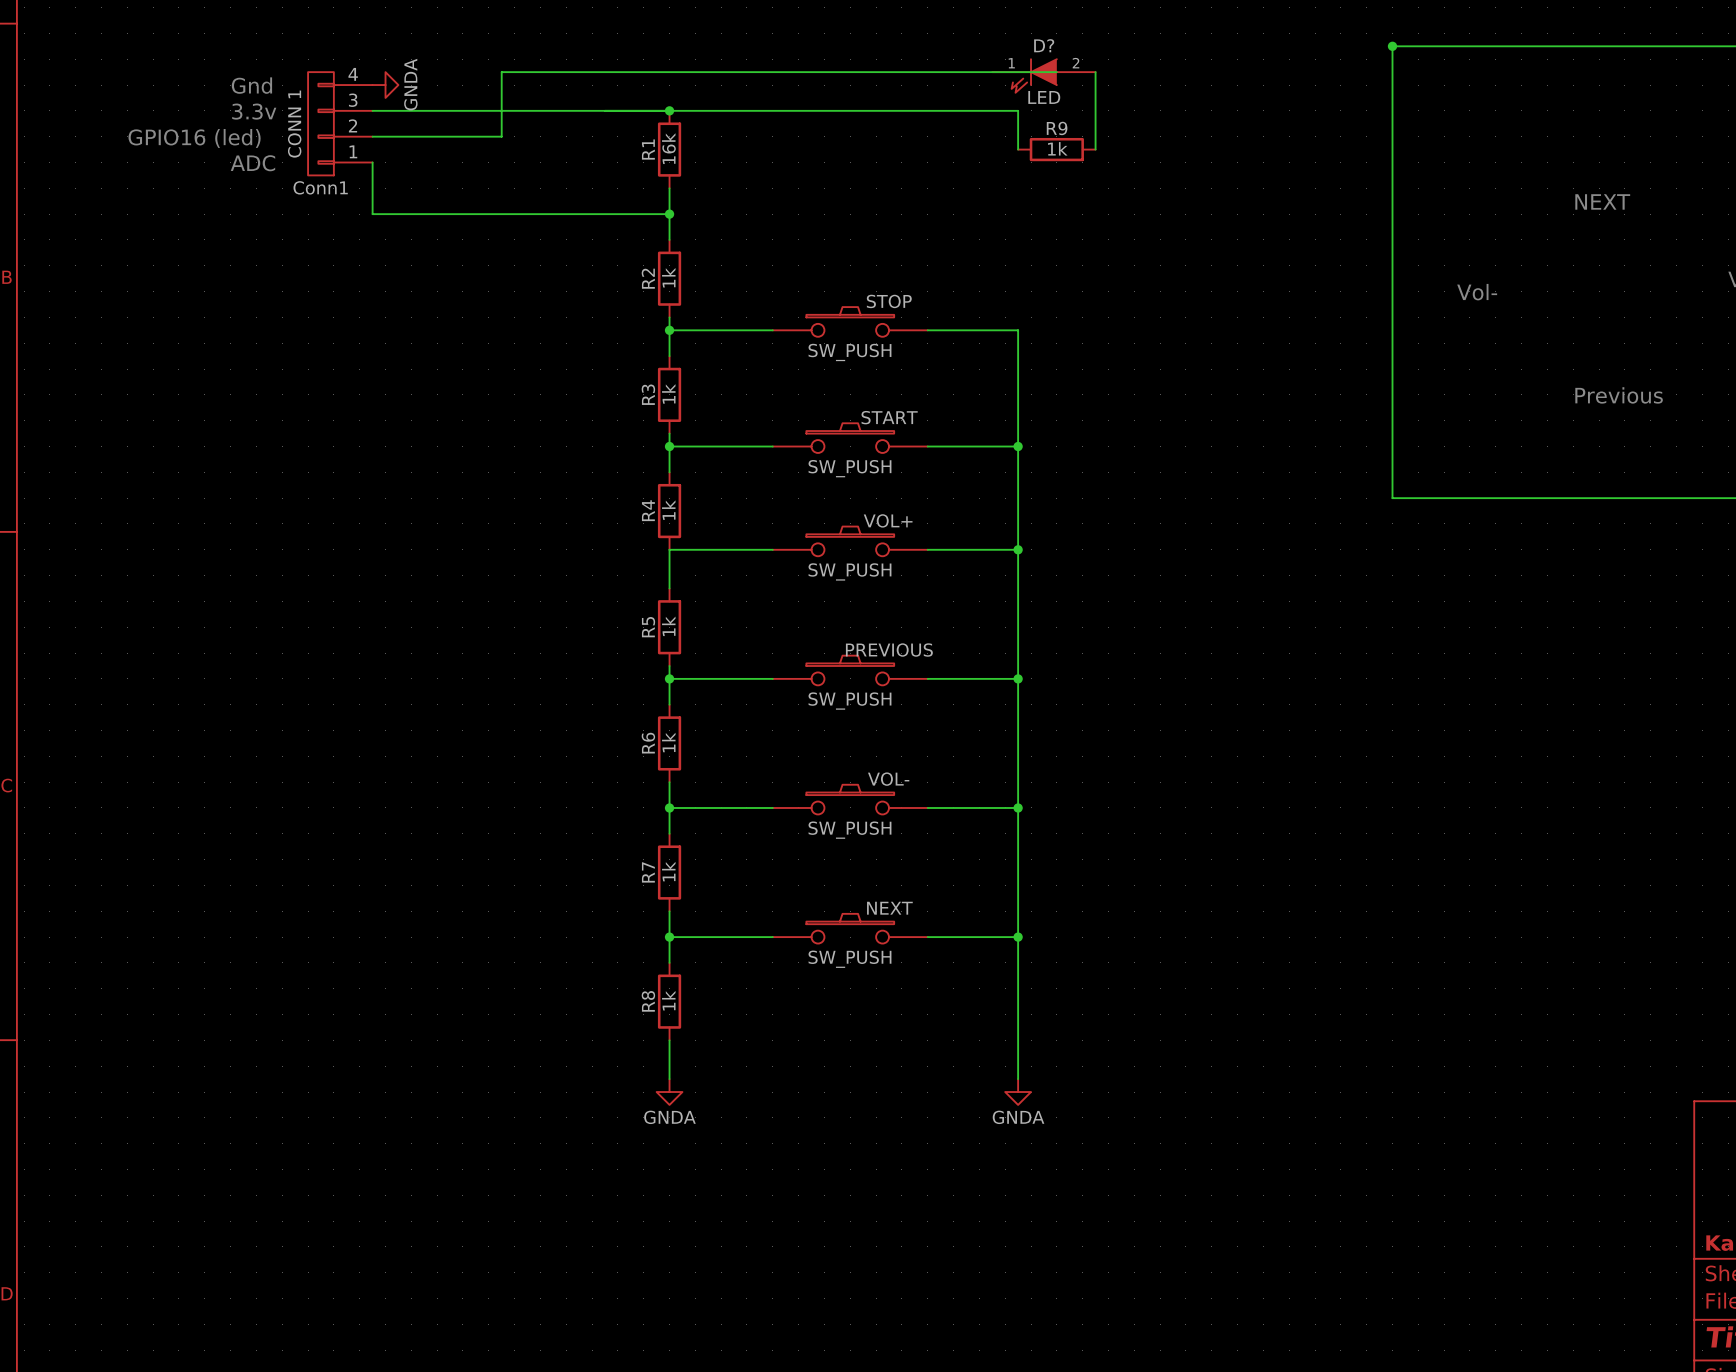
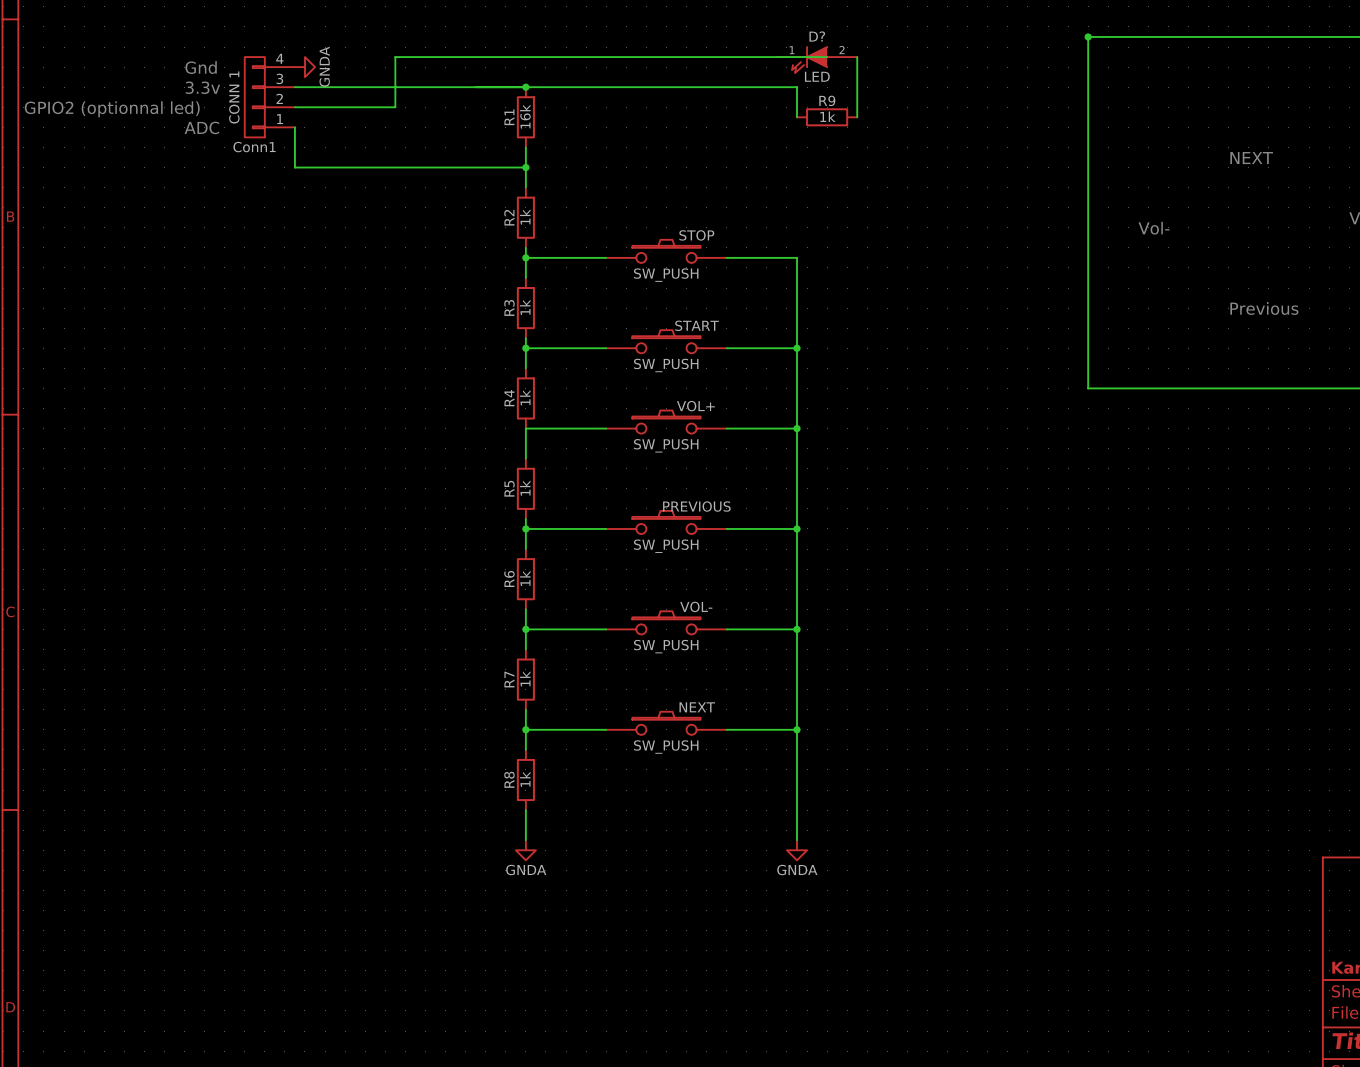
text: GPIO16 (led) (194, 138) -> GPIO2 (optionnal led) (112, 109)

